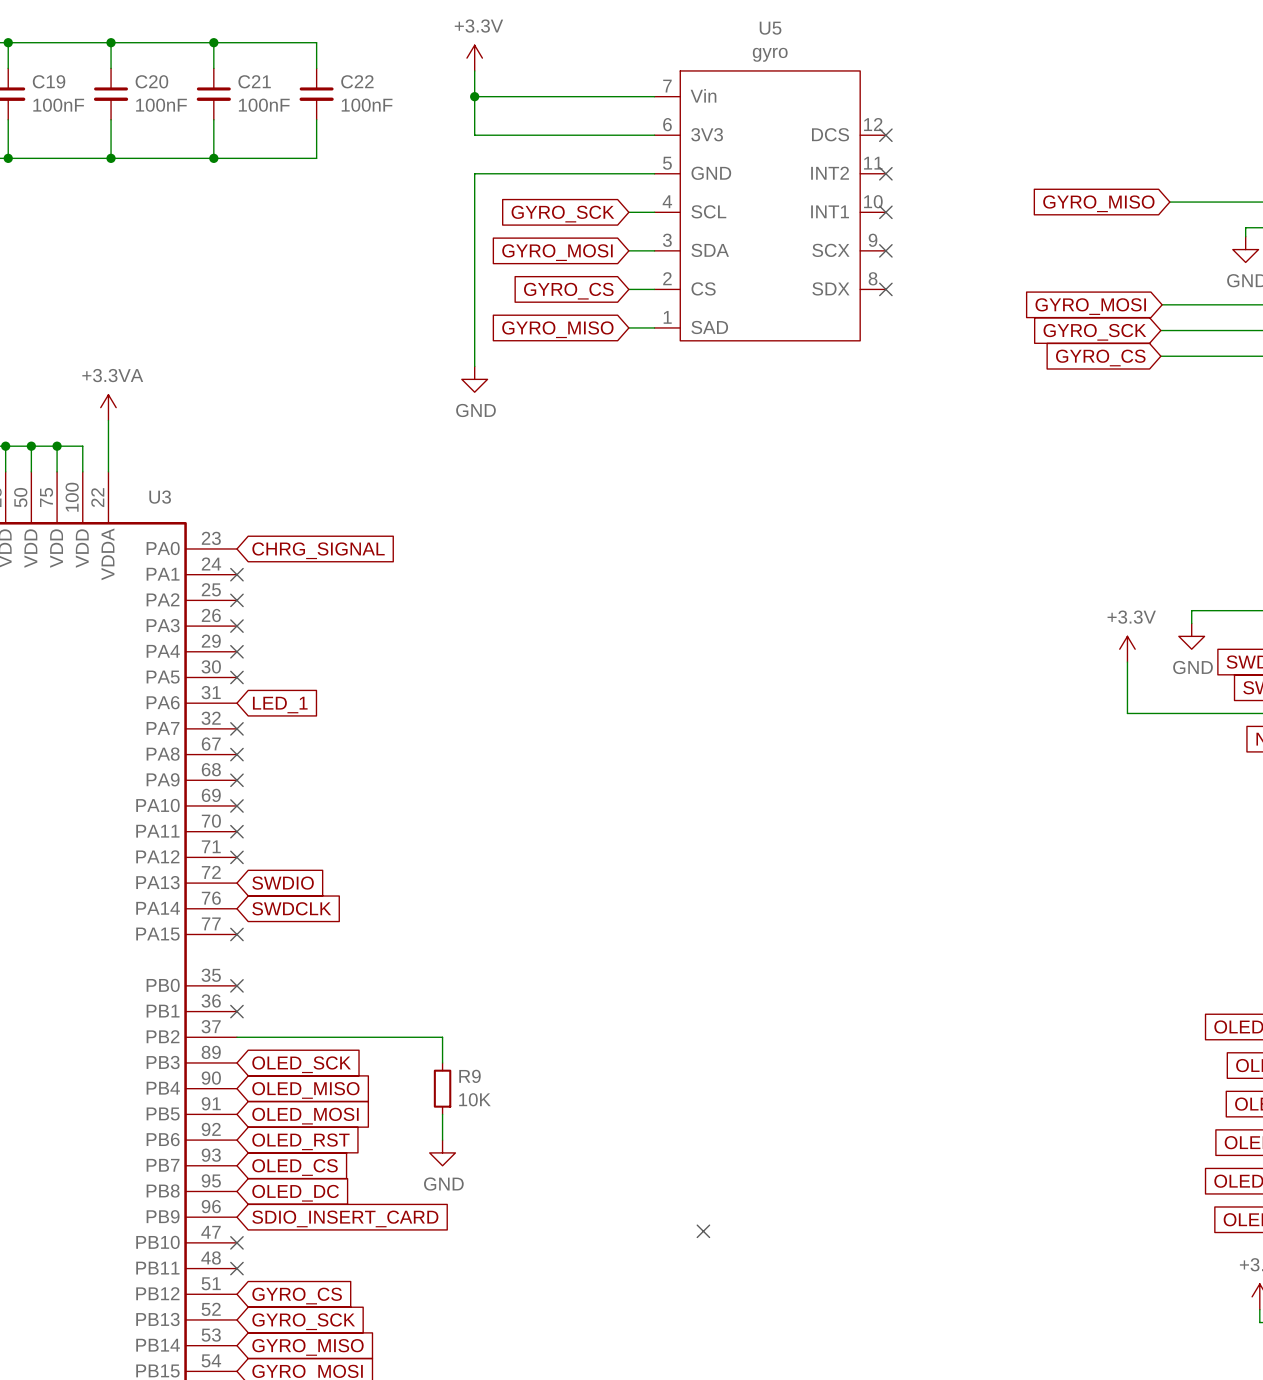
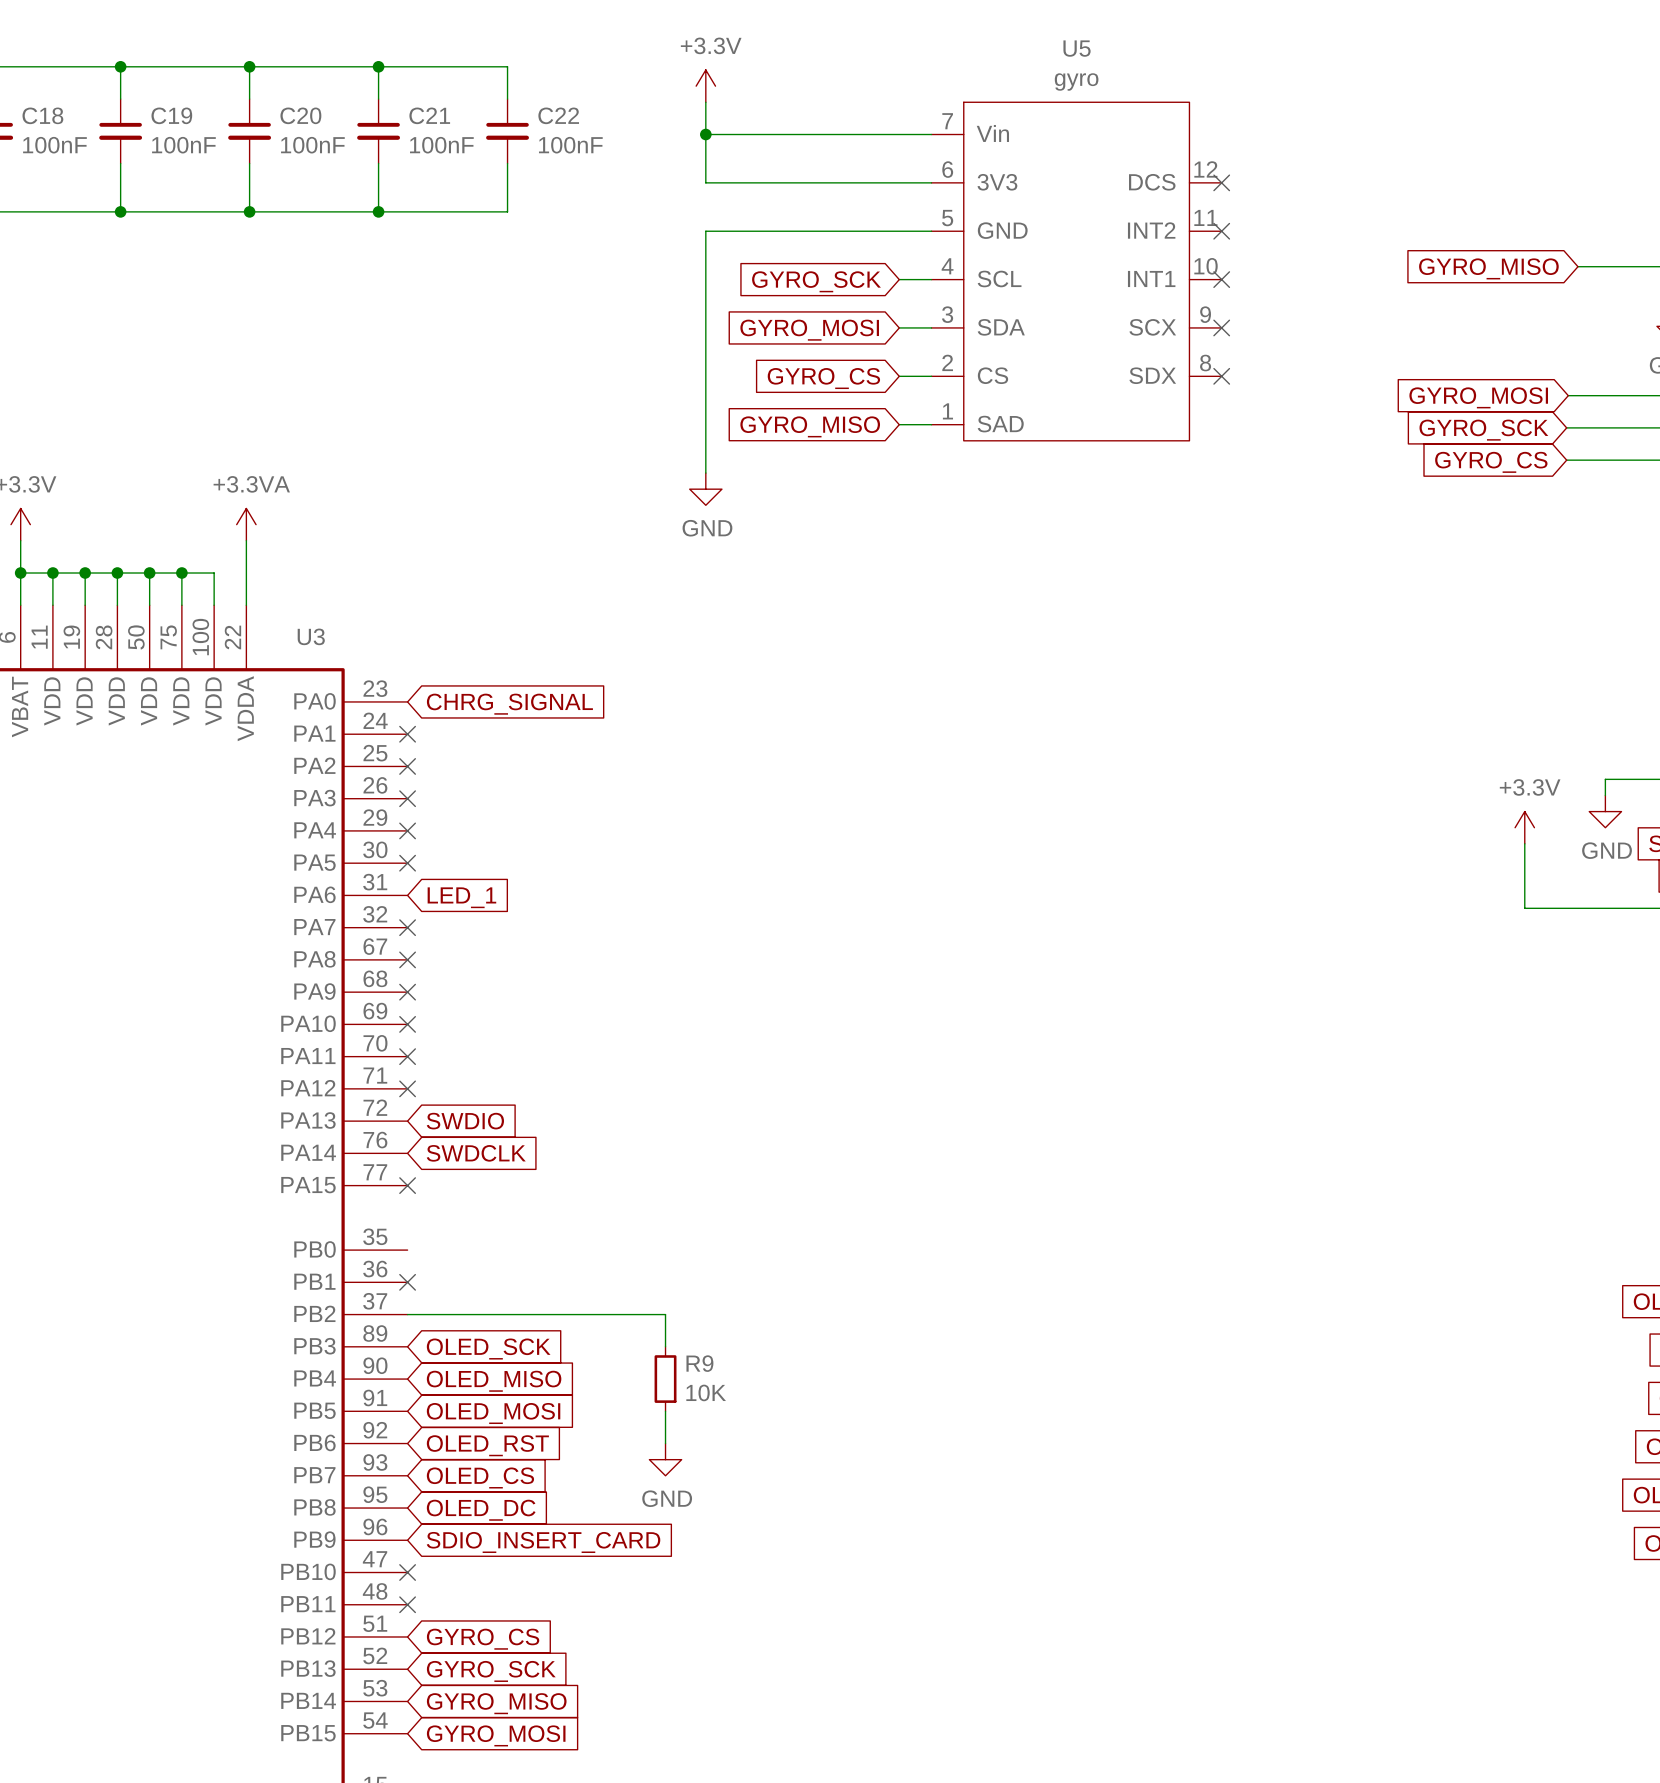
no-connect mark: (236, 985) -> none
no-connect mark: (703, 1231) -> none

